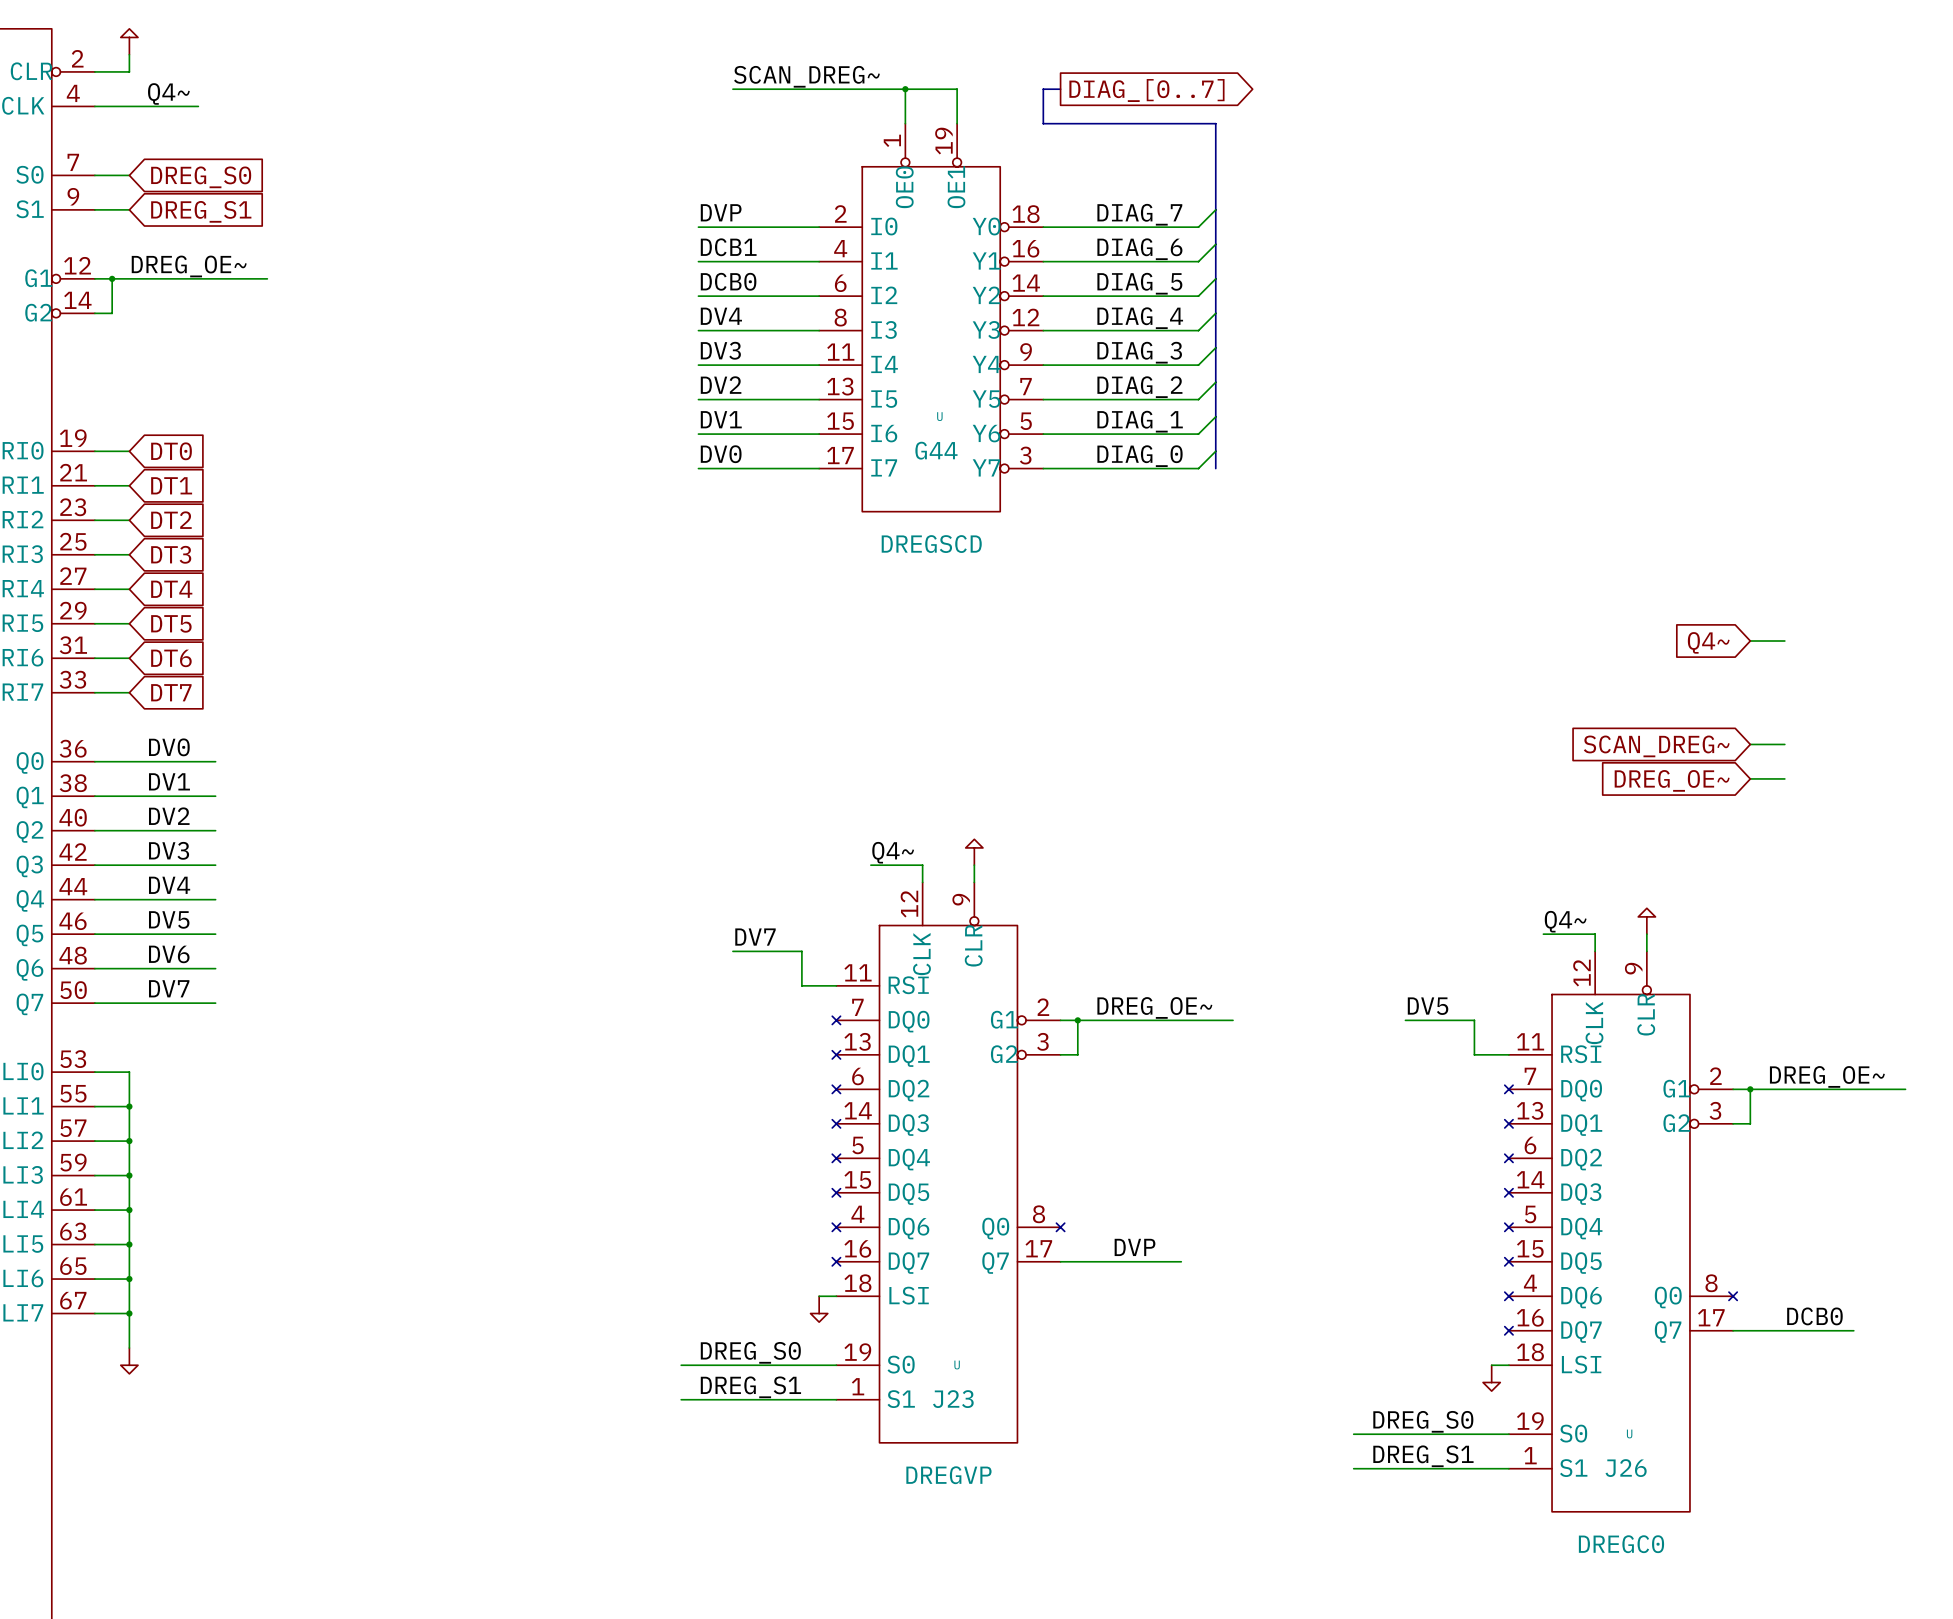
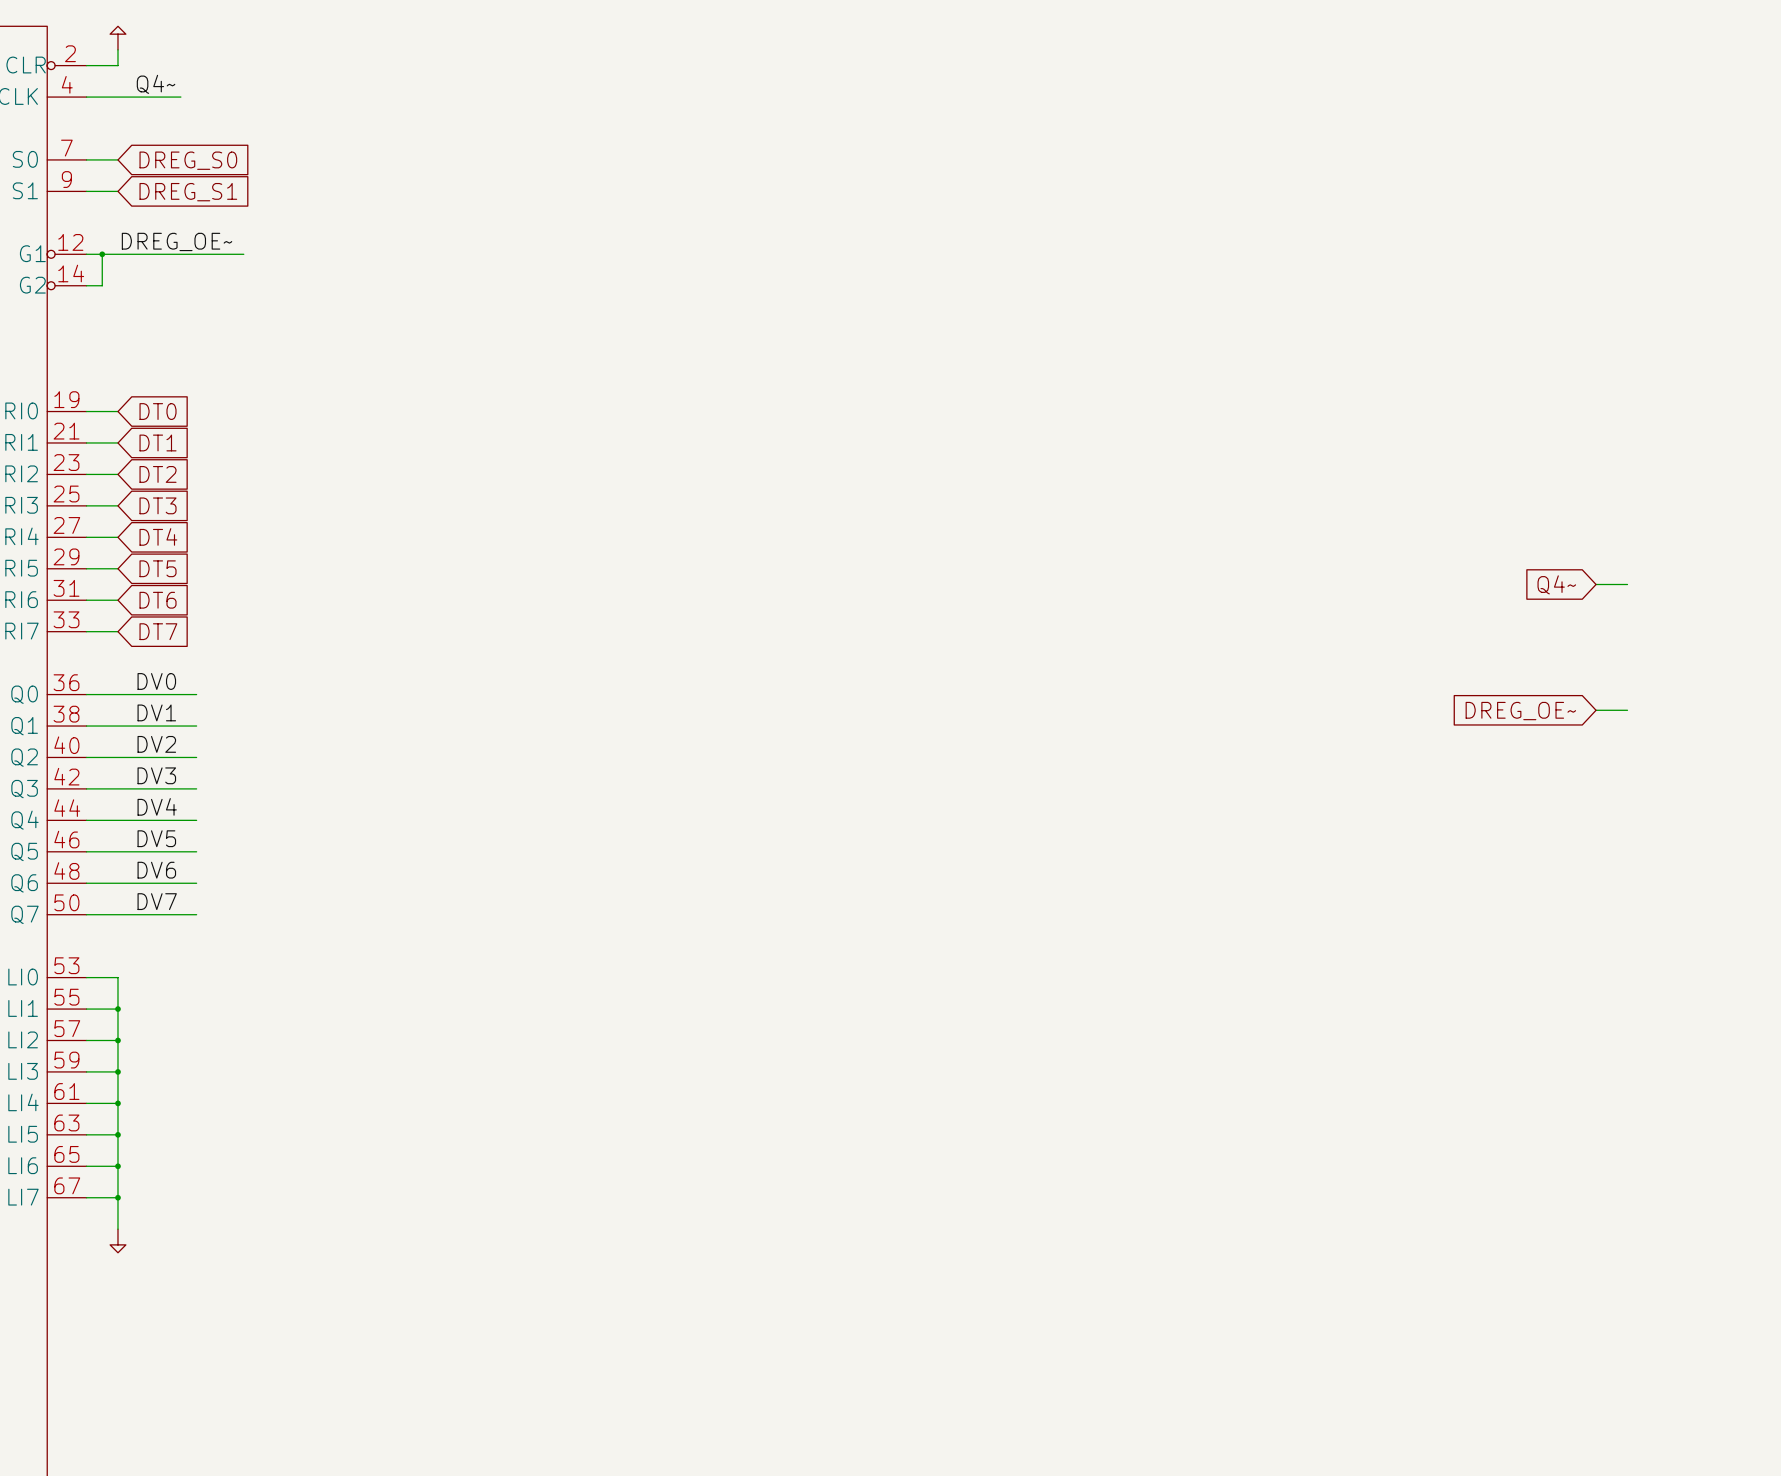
label: SCAN_DREG~ (806, 76) -> none
wire: (732, 89) (957, 89) (957, 123) -> none
wire: (905, 89) (905, 123) -> none
junction: (905, 89) -> none
bus: (1060, 89) (1043, 89) (1043, 123) (1215, 123) (1215, 468) -> none
global label: DIAG_[0..7] (1146, 90) -> none
wire: (1215, 209) (1198, 227) (1043, 227) -> none
label: DVP (721, 212) -> none
label: DIAG_7 (1139, 214) -> none
wire: (698, 227) (819, 227) -> none
wire: (1215, 244) (1198, 261) (1043, 261) -> none
label: DCB1 (728, 247) -> none
label: DIAG_6 (1139, 249) -> none
wire: (698, 261) (819, 261) -> none
wire: (1215, 278) (1198, 296) (1043, 296) -> none
label: DCB0 (728, 281) -> none
label: DIAG_5 (1139, 283) -> none
wire: (698, 296) (819, 296) -> none
wire: (1215, 313) (1198, 330) (1043, 330) -> none
label: DV4 (721, 316) -> none
U: (931, 317) -> none
label: DIAG_4 (1140, 318) -> none
wire: (698, 330) (819, 330) -> none
wire: (1215, 347) (1198, 365) (1043, 365) -> none
label: DV3 (720, 350) -> none
label: DIAG_3 (1139, 352) -> none
wire: (698, 365) (819, 365) -> none
wire: (1215, 382) (1198, 399) (1043, 399) -> none
label: DV2 (721, 385) -> none
label: DIAG_2 (1139, 387) -> none
wire: (698, 399) (819, 399) -> none
wire: (1215, 416) (1198, 434) (1043, 434) -> none
label: DV1 (721, 419) -> none
label: DIAG_1 (1140, 421) -> none
wire: (698, 434) (819, 434) -> none
wire: (1215, 451) (1198, 468) (1043, 468) -> none
label: DV0 (721, 454) -> none
label: DIAG_0 (1140, 456) -> none
wire: (698, 468) (819, 468) -> none
wire: (1750, 744) (1784, 744) -> none
global label: SCAN_DREG~ (1656, 746) -> none
power symbol: (974, 851) -> none
label: Q4~ (893, 852) -> none
wire: (870, 865) (922, 865) (922, 882) -> none
wire: (974, 865) (974, 882) -> none
power symbol: (1646, 920) -> none
label: Q4~ (1565, 921) -> none
wire: (1543, 934) (1595, 934) (1595, 951) -> none
wire: (1646, 934) (1646, 951) -> none
label: DV7 (755, 937) -> none
wire: (732, 951) (801, 951) (801, 985) (836, 985) -> none
label: DV5 (1428, 1006) -> none
label: DREG_OE~ (1154, 1007) -> none
no-connect mark: (836, 1020) -> none
wire: (1060, 1020) (1233, 1020) -> none
wire: (1077, 1020) (1077, 1054) (1060, 1054) -> none
junction: (1077, 1020) -> none
wire: (1405, 1020) (1474, 1020) (1474, 1054) (1508, 1054) -> none
no-connect mark: (836, 1054) -> none
label: DREG_OE~ (1827, 1076) -> none
no-connect mark: (836, 1089) -> none
no-connect mark: (1508, 1089) -> none
wire: (1733, 1089) (1905, 1089) -> none
wire: (1750, 1089) (1750, 1123) (1733, 1123) -> none
junction: (1750, 1089) -> none
no-connect mark: (836, 1123) -> none
no-connect mark: (1508, 1123) -> none
no-connect mark: (836, 1158) -> none
no-connect mark: (1508, 1158) -> none
U: (948, 1162) -> none
no-connect mark: (836, 1192) -> none
no-connect mark: (1508, 1192) -> none
no-connect mark: (836, 1227) -> none
no-connect mark: (1060, 1227) -> none
no-connect mark: (1508, 1227) -> none
U: (1621, 1231) -> none
label: DVP (1135, 1247) -> none
no-connect mark: (836, 1261) -> none
wire: (1060, 1261) (1181, 1261) -> none
no-connect mark: (1508, 1261) -> none
wire: (819, 1296) (836, 1296) -> none
no-connect mark: (1508, 1296) -> none
no-connect mark: (1733, 1296) -> none
power symbol: (819, 1309) -> none
label: DCB0 (1814, 1316) -> none
no-connect mark: (1508, 1330) -> none
wire: (1733, 1330) (1853, 1330) -> none
label: DREG_S0 (750, 1352) -> none
wire: (681, 1365) (836, 1365) -> none
wire: (1491, 1365) (1508, 1365) -> none
power symbol: (1491, 1378) -> none
label: DREG_S1 (750, 1387) -> none
wire: (681, 1399) (836, 1399) -> none
label: DREG_S0 (1423, 1421) -> none
wire: (1353, 1434) (1508, 1434) -> none
label: DREG_S1 (1423, 1456) -> none
wire: (1353, 1468) (1508, 1468) -> none

